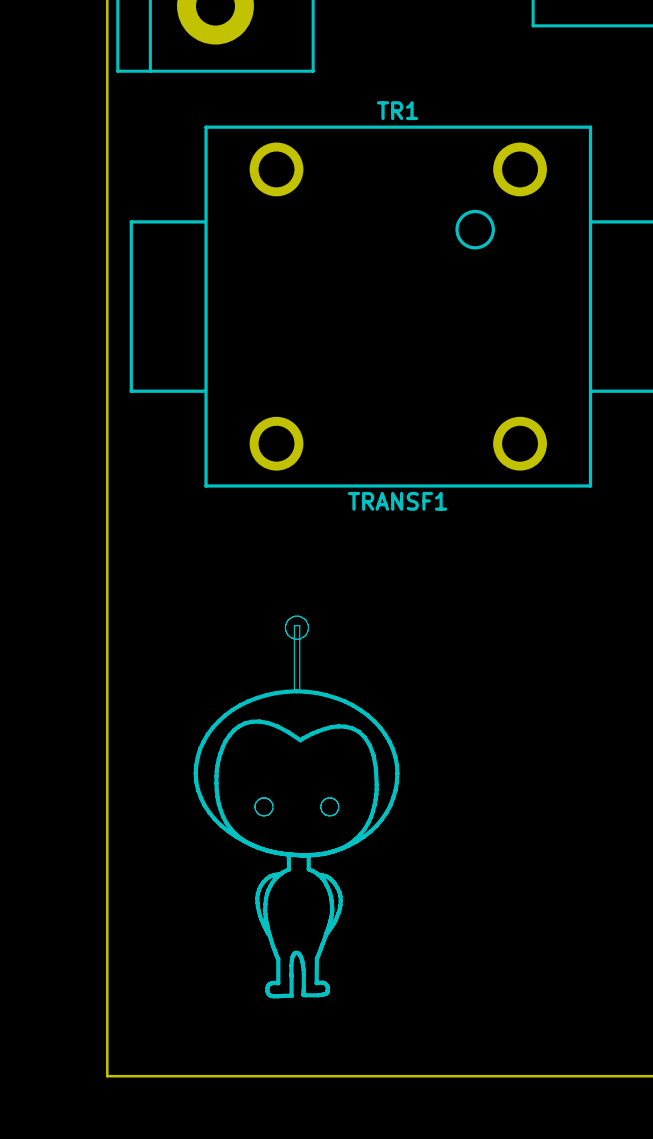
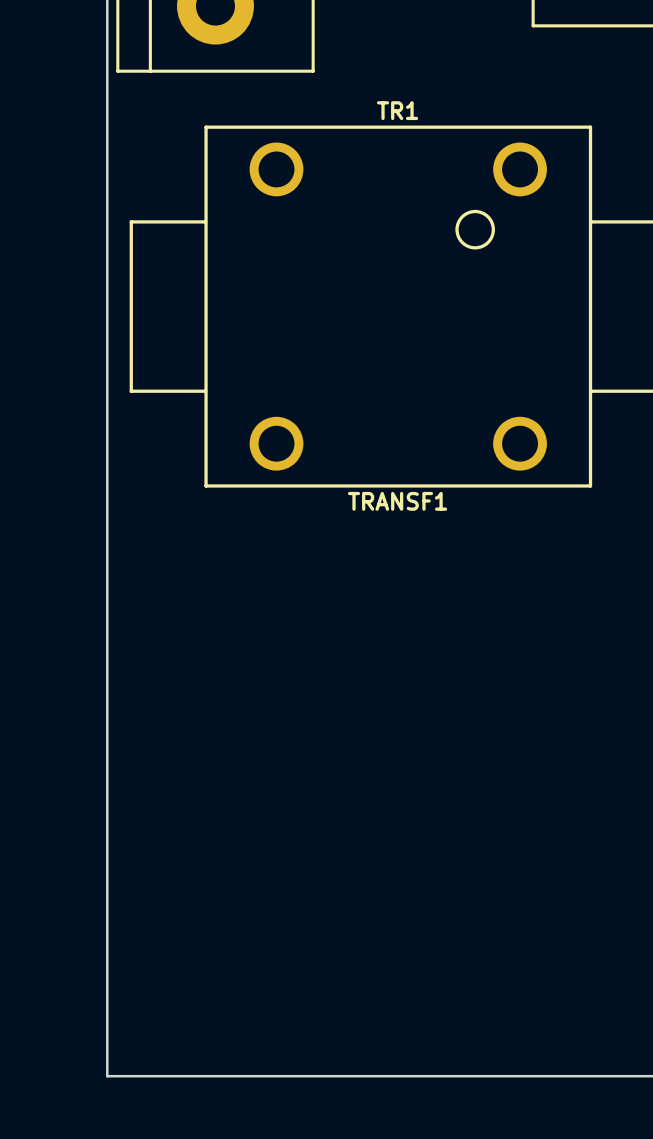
drawing: [193, 615, 400, 999] -> none

